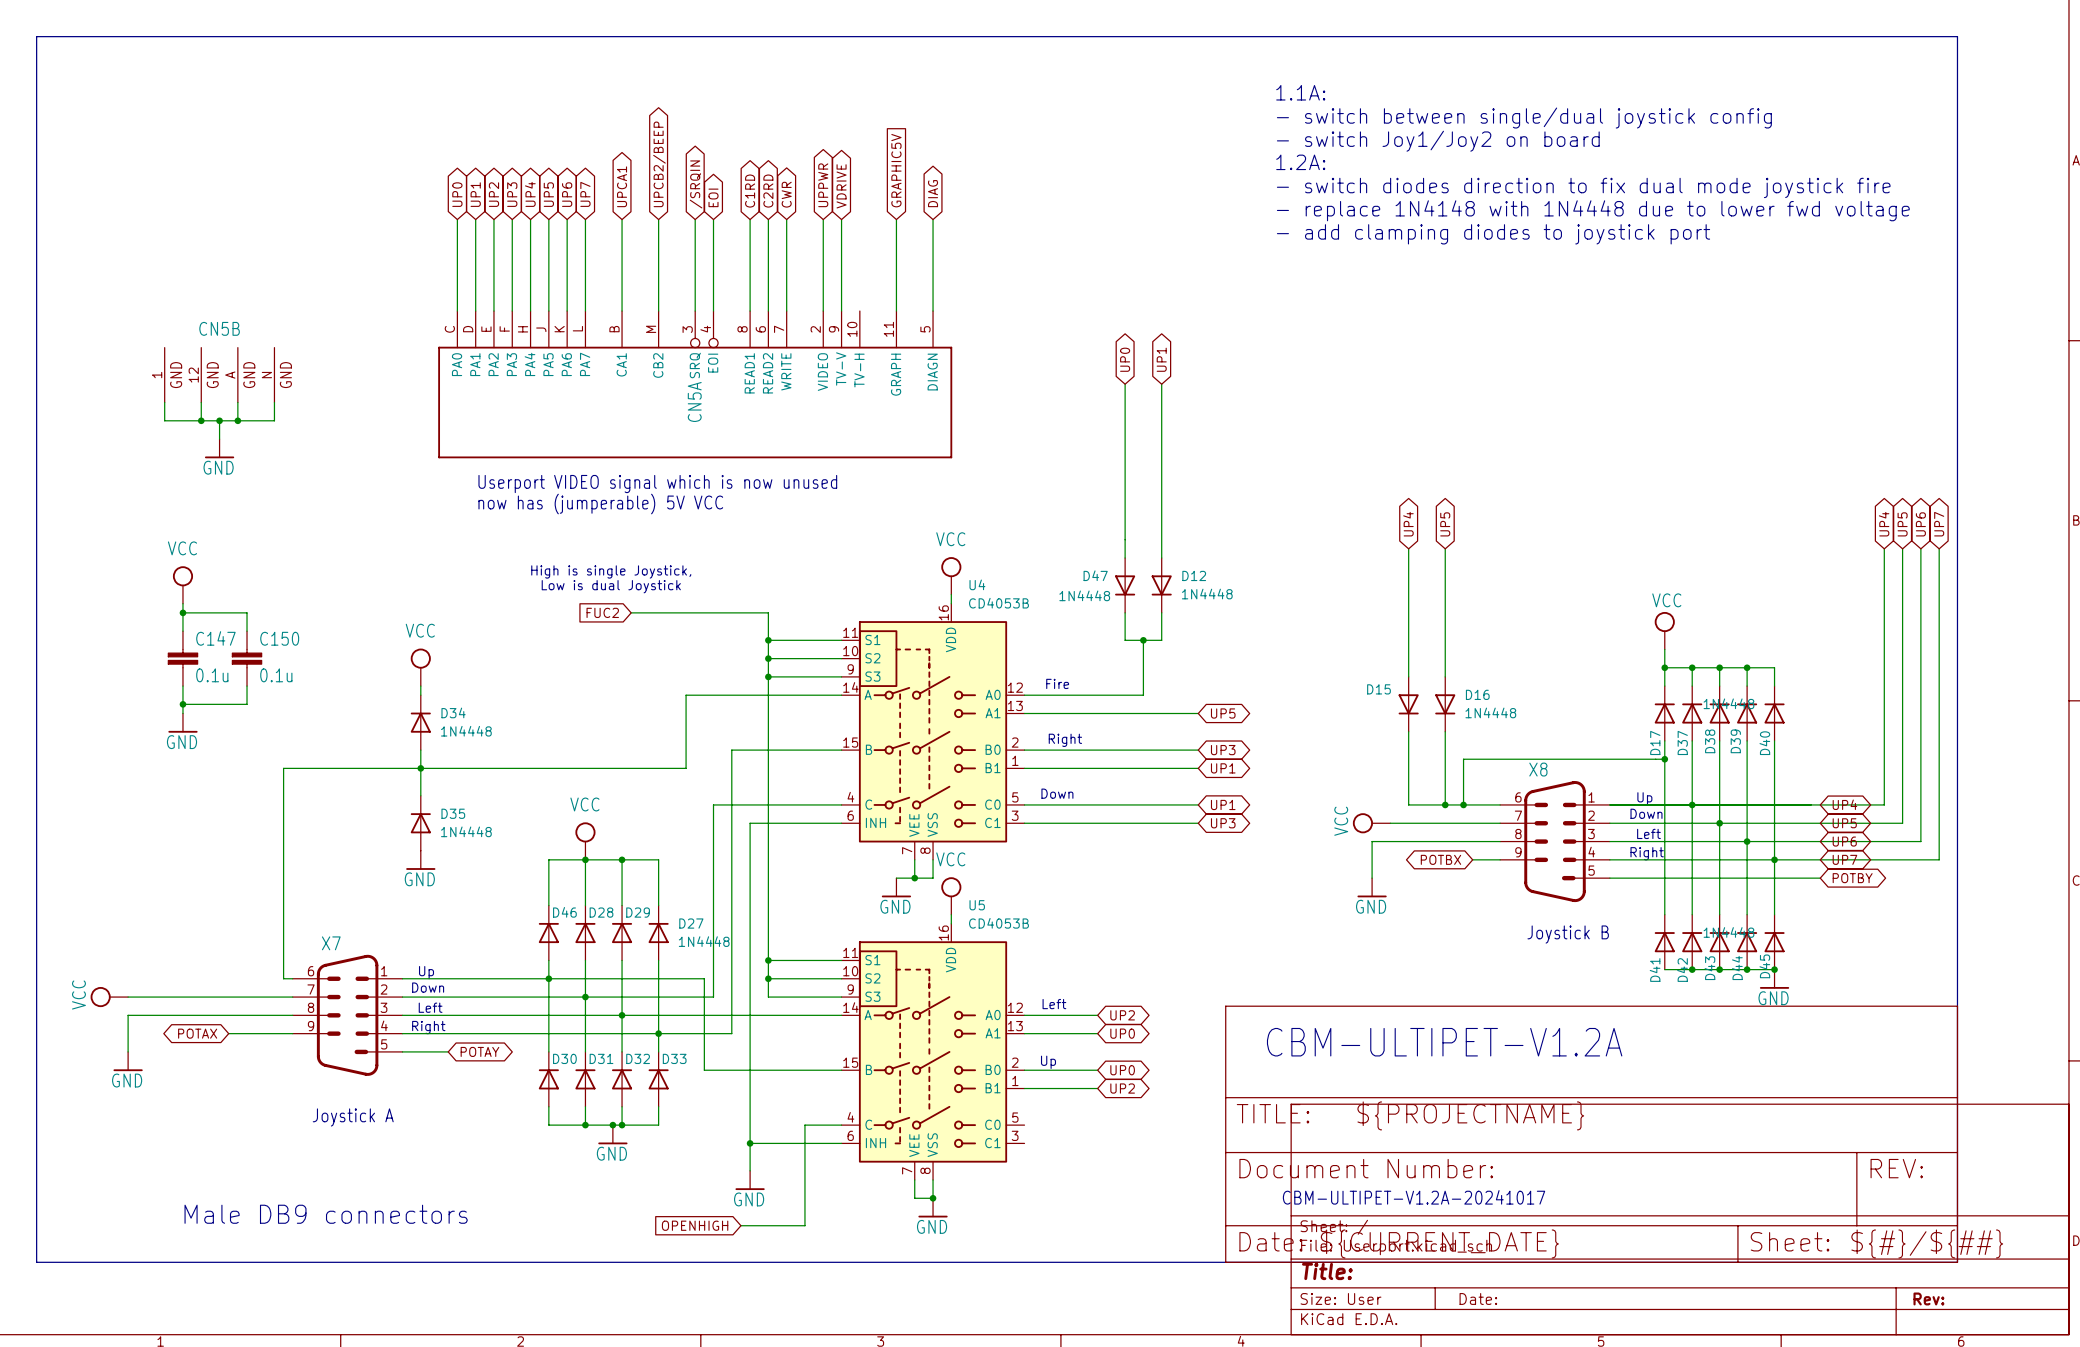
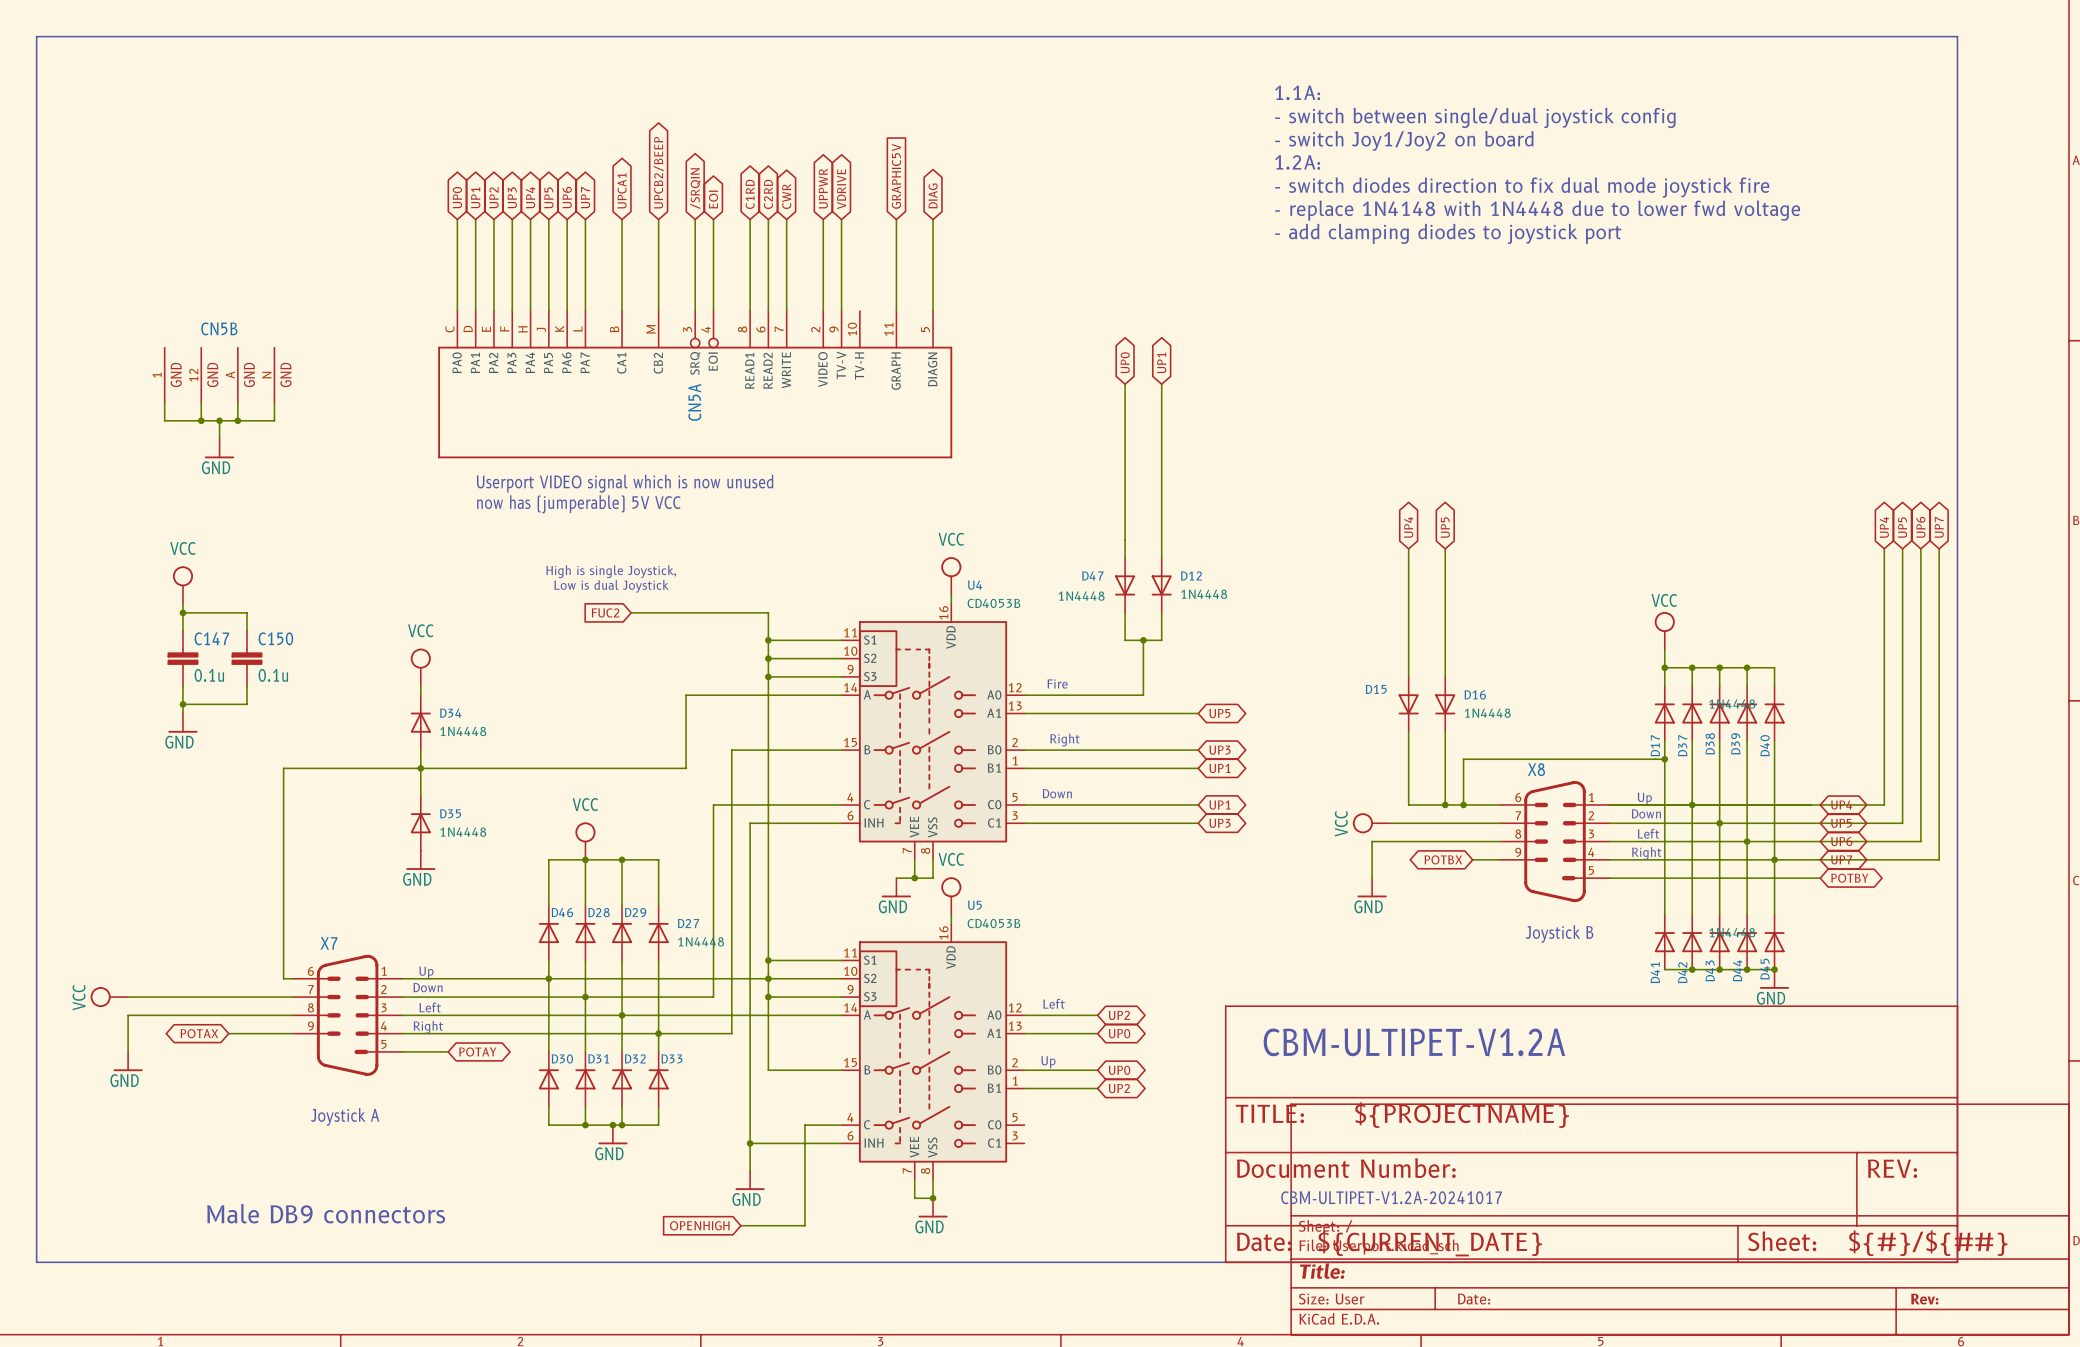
wire: (704, 978) (704, 1070) (768, 1070) -> (768, 997) (768, 1070)
wire: none -> (704, 978) (768, 978)
junction: none -> (768, 997)

